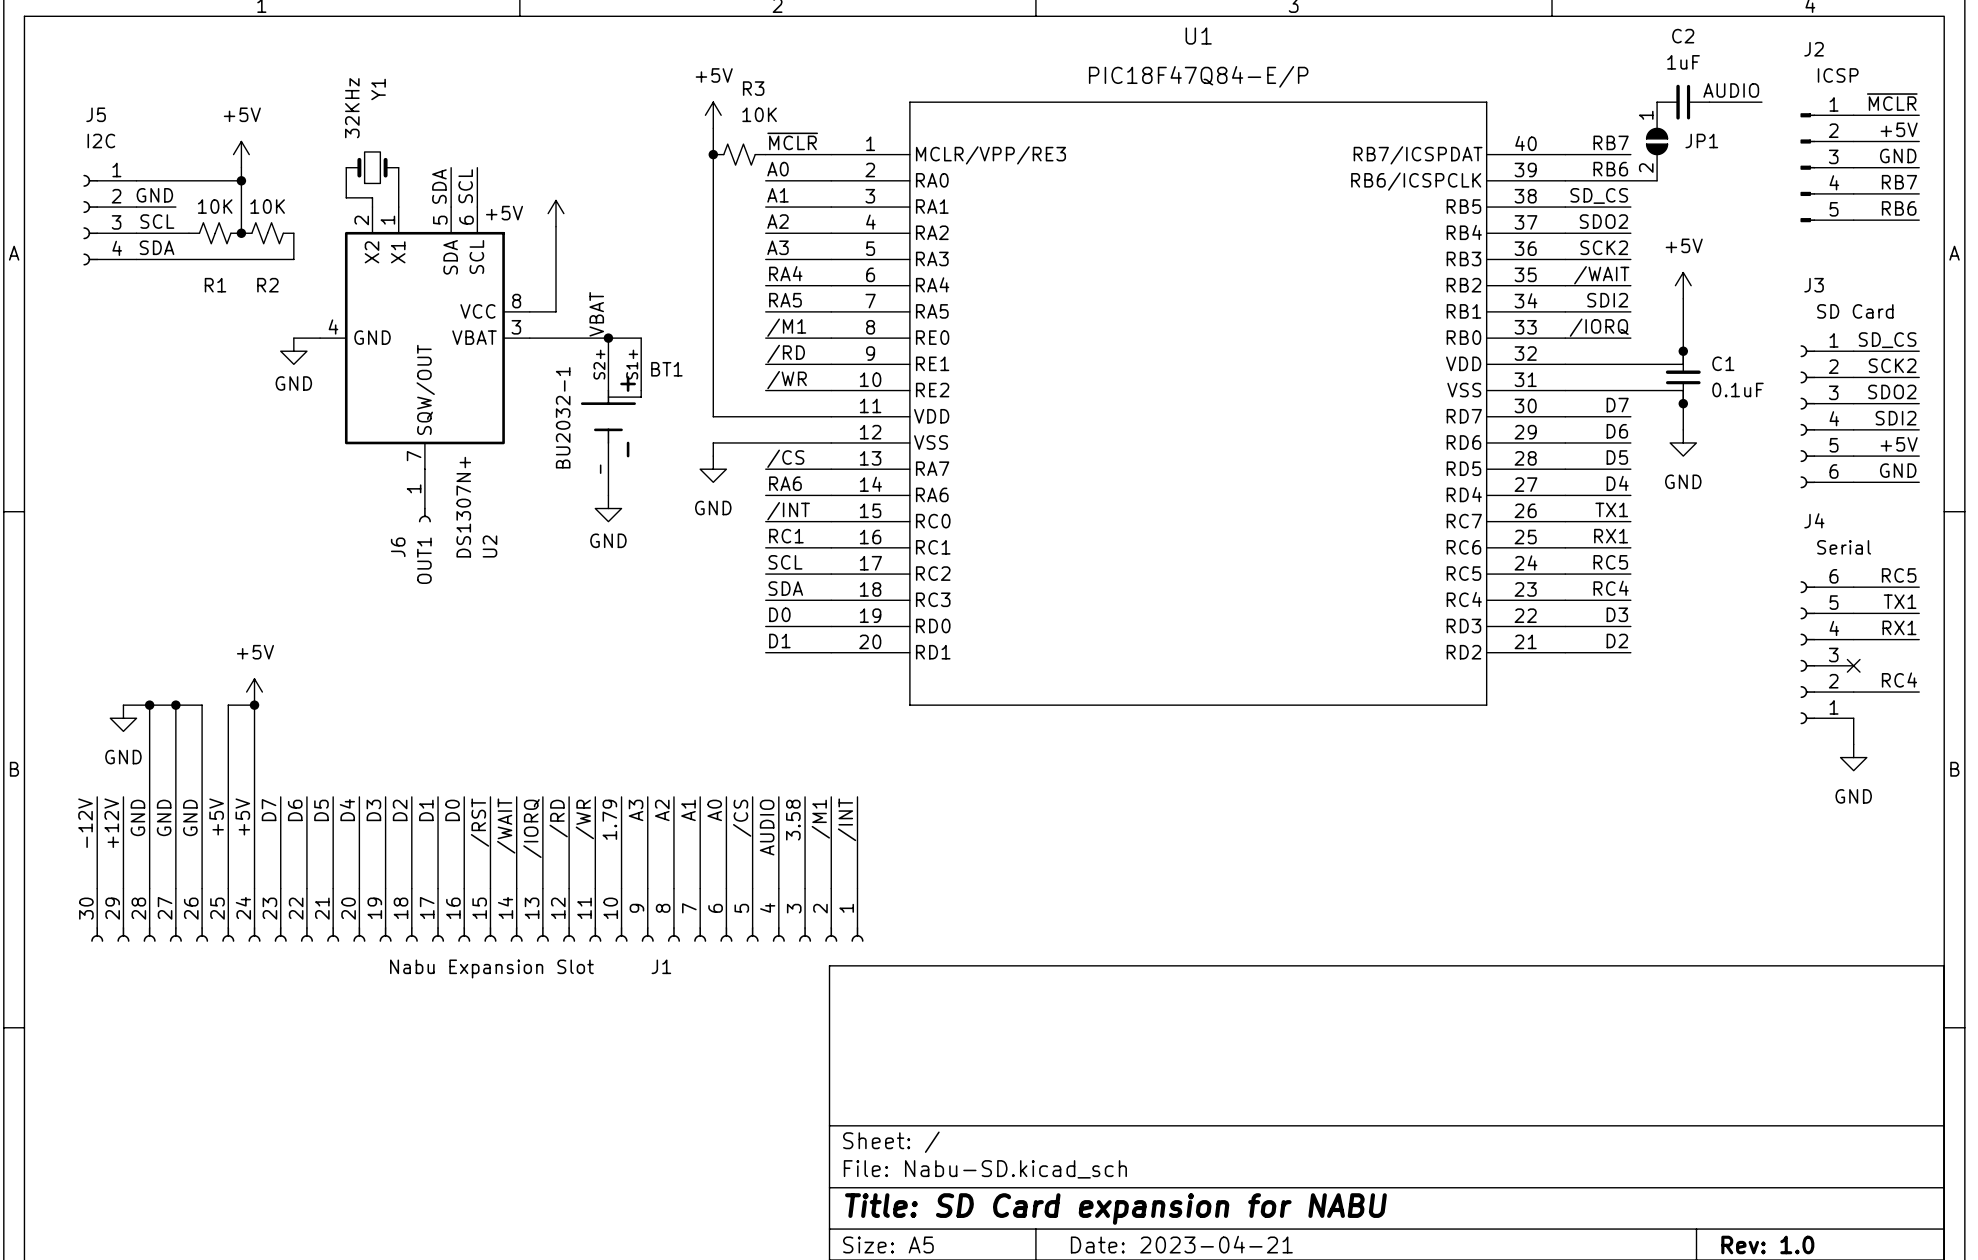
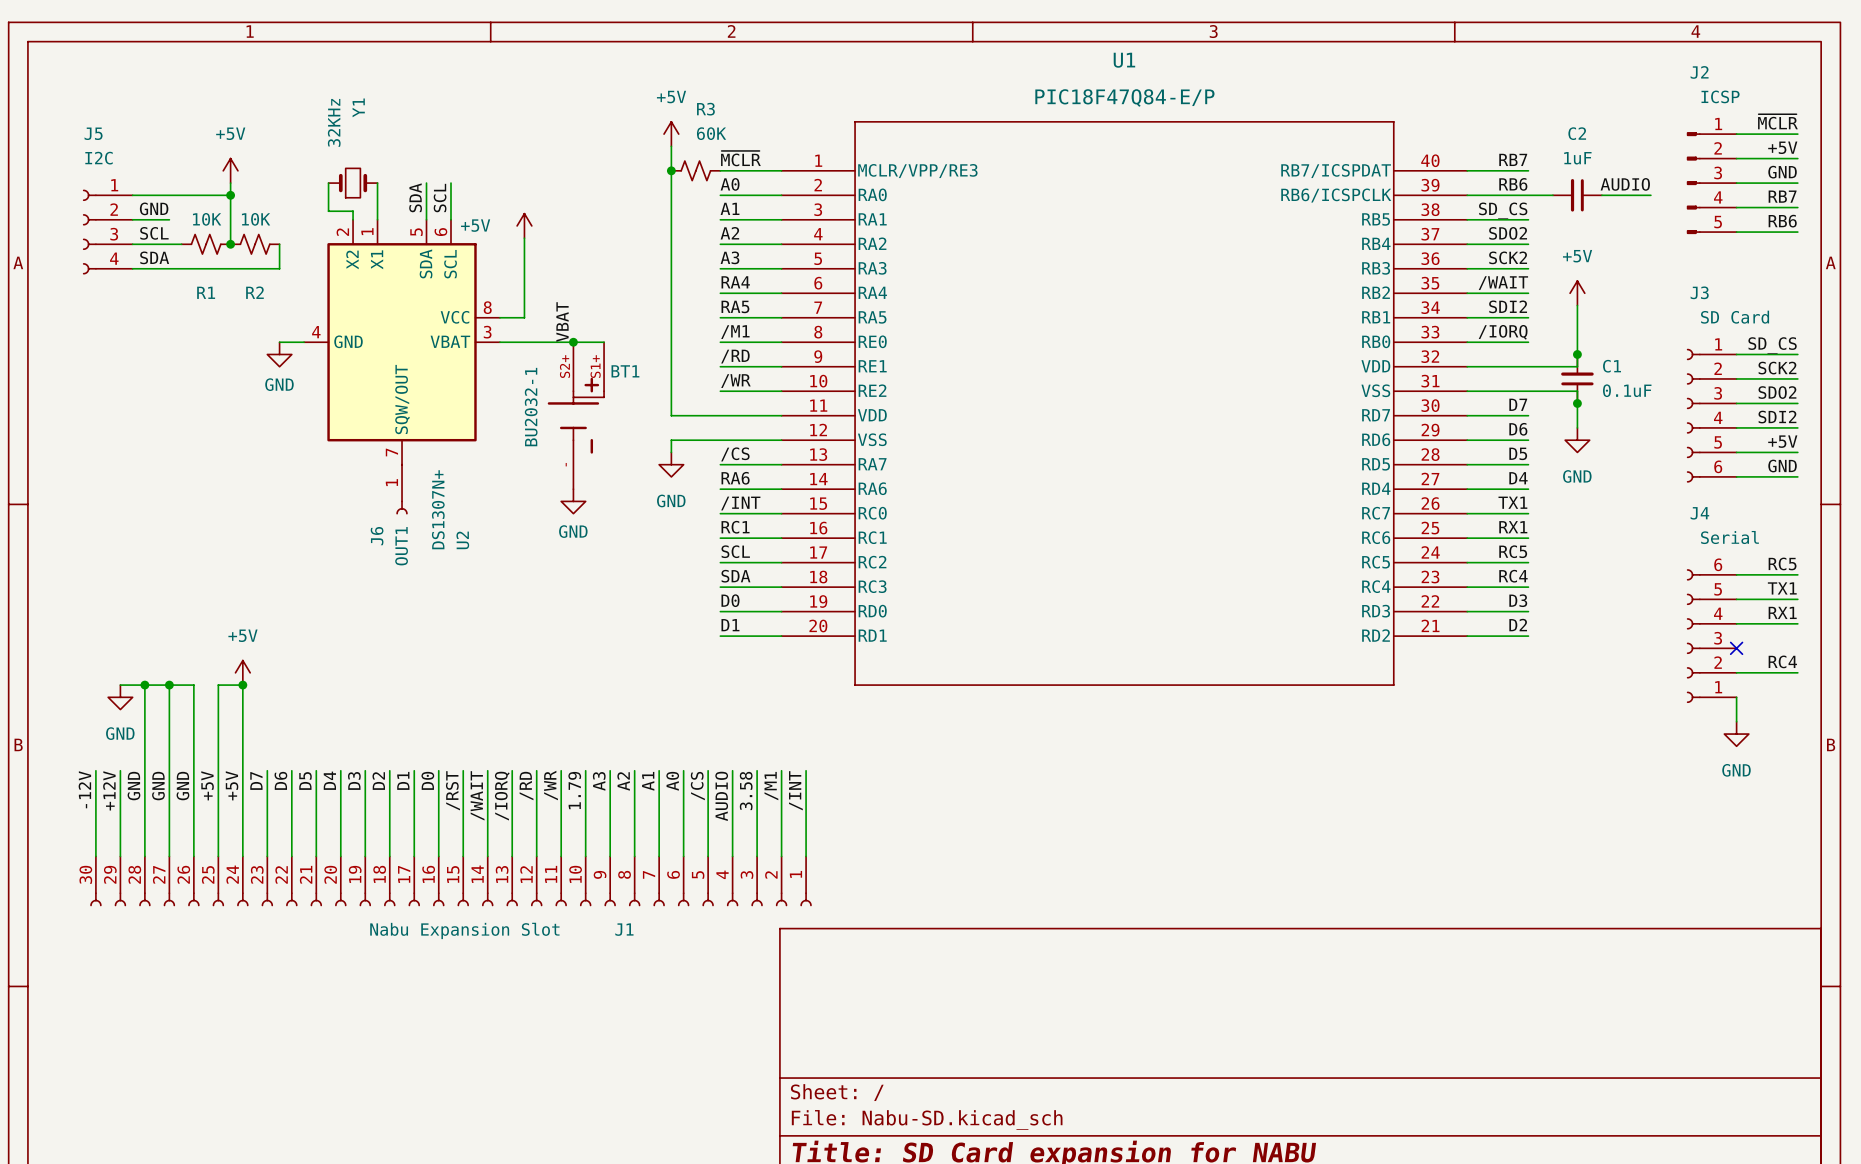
label position: AUDIO (1731, 90) -> AUDIO (1625, 184)
C2 position: (1683, 102) -> (1577, 195)
wire: (1709, 102) (1761, 102) -> (1601, 195) (1650, 195)
R3 value: 10K (759, 114) -> 60K (711, 133)
JP1: (1657, 141) -> none

